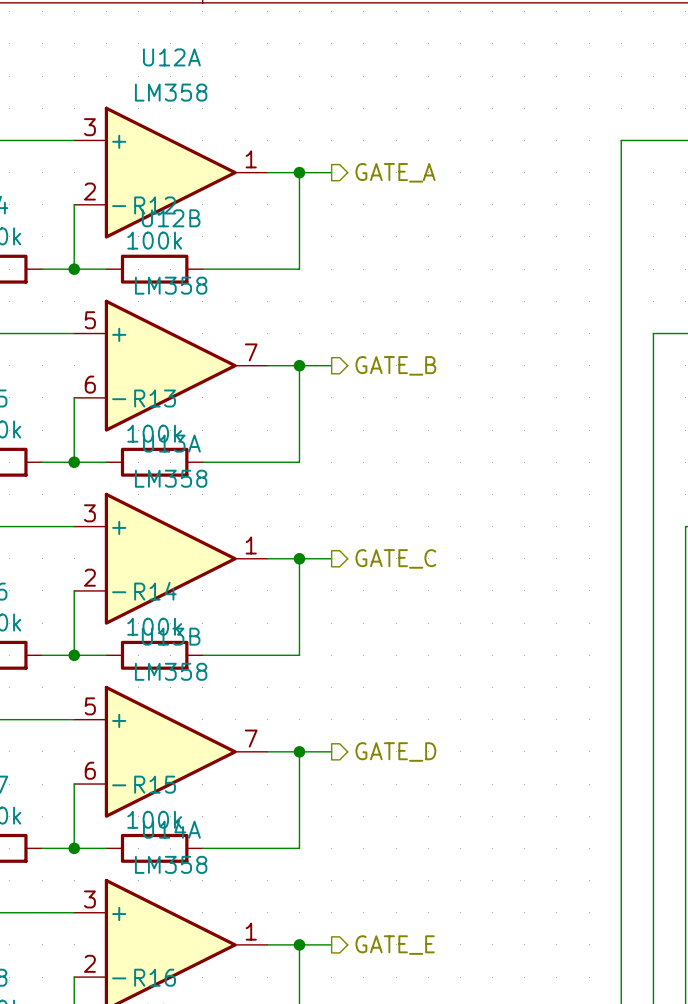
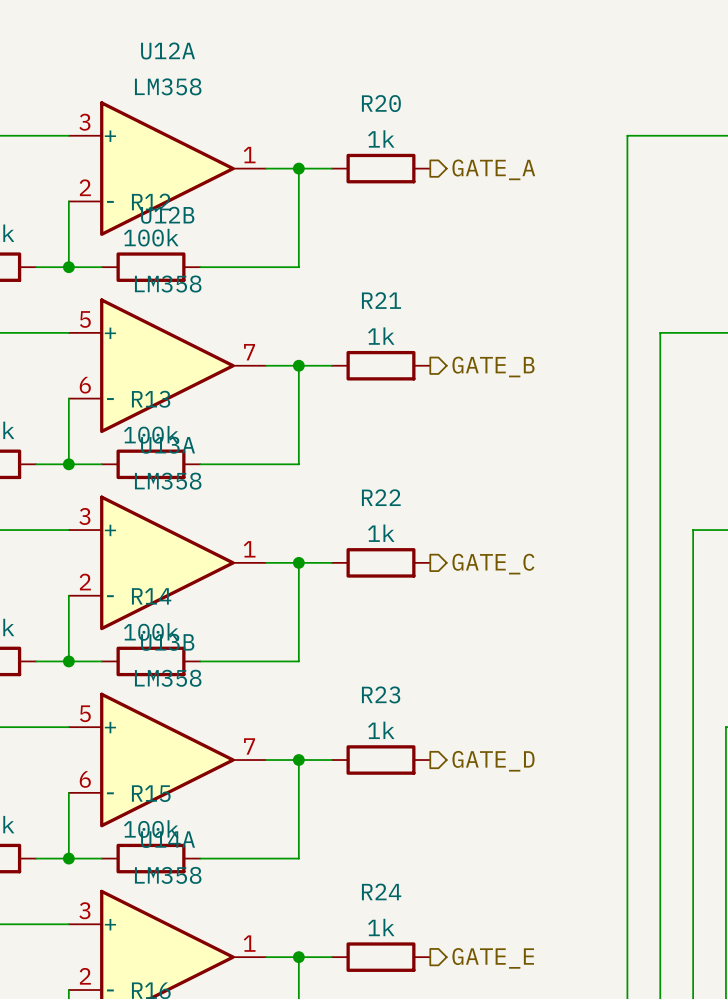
R20: none -> 1k (380, 168)
hierarchical label position: GATE_A (395, 172) -> GATE_A (493, 169)
R21: none -> 1k (380, 365)
hierarchical label position: GATE_B (395, 365) -> GATE_B (493, 366)
R22: none -> 1k (380, 562)
hierarchical label position: GATE_C (395, 558) -> GATE_C (493, 564)
R23: none -> 1k (380, 760)
hierarchical label position: GATE_D (395, 752) -> GATE_D (493, 761)
R24: none -> 1k (380, 957)
hierarchical label position: GATE_E (395, 945) -> GATE_E (493, 958)

